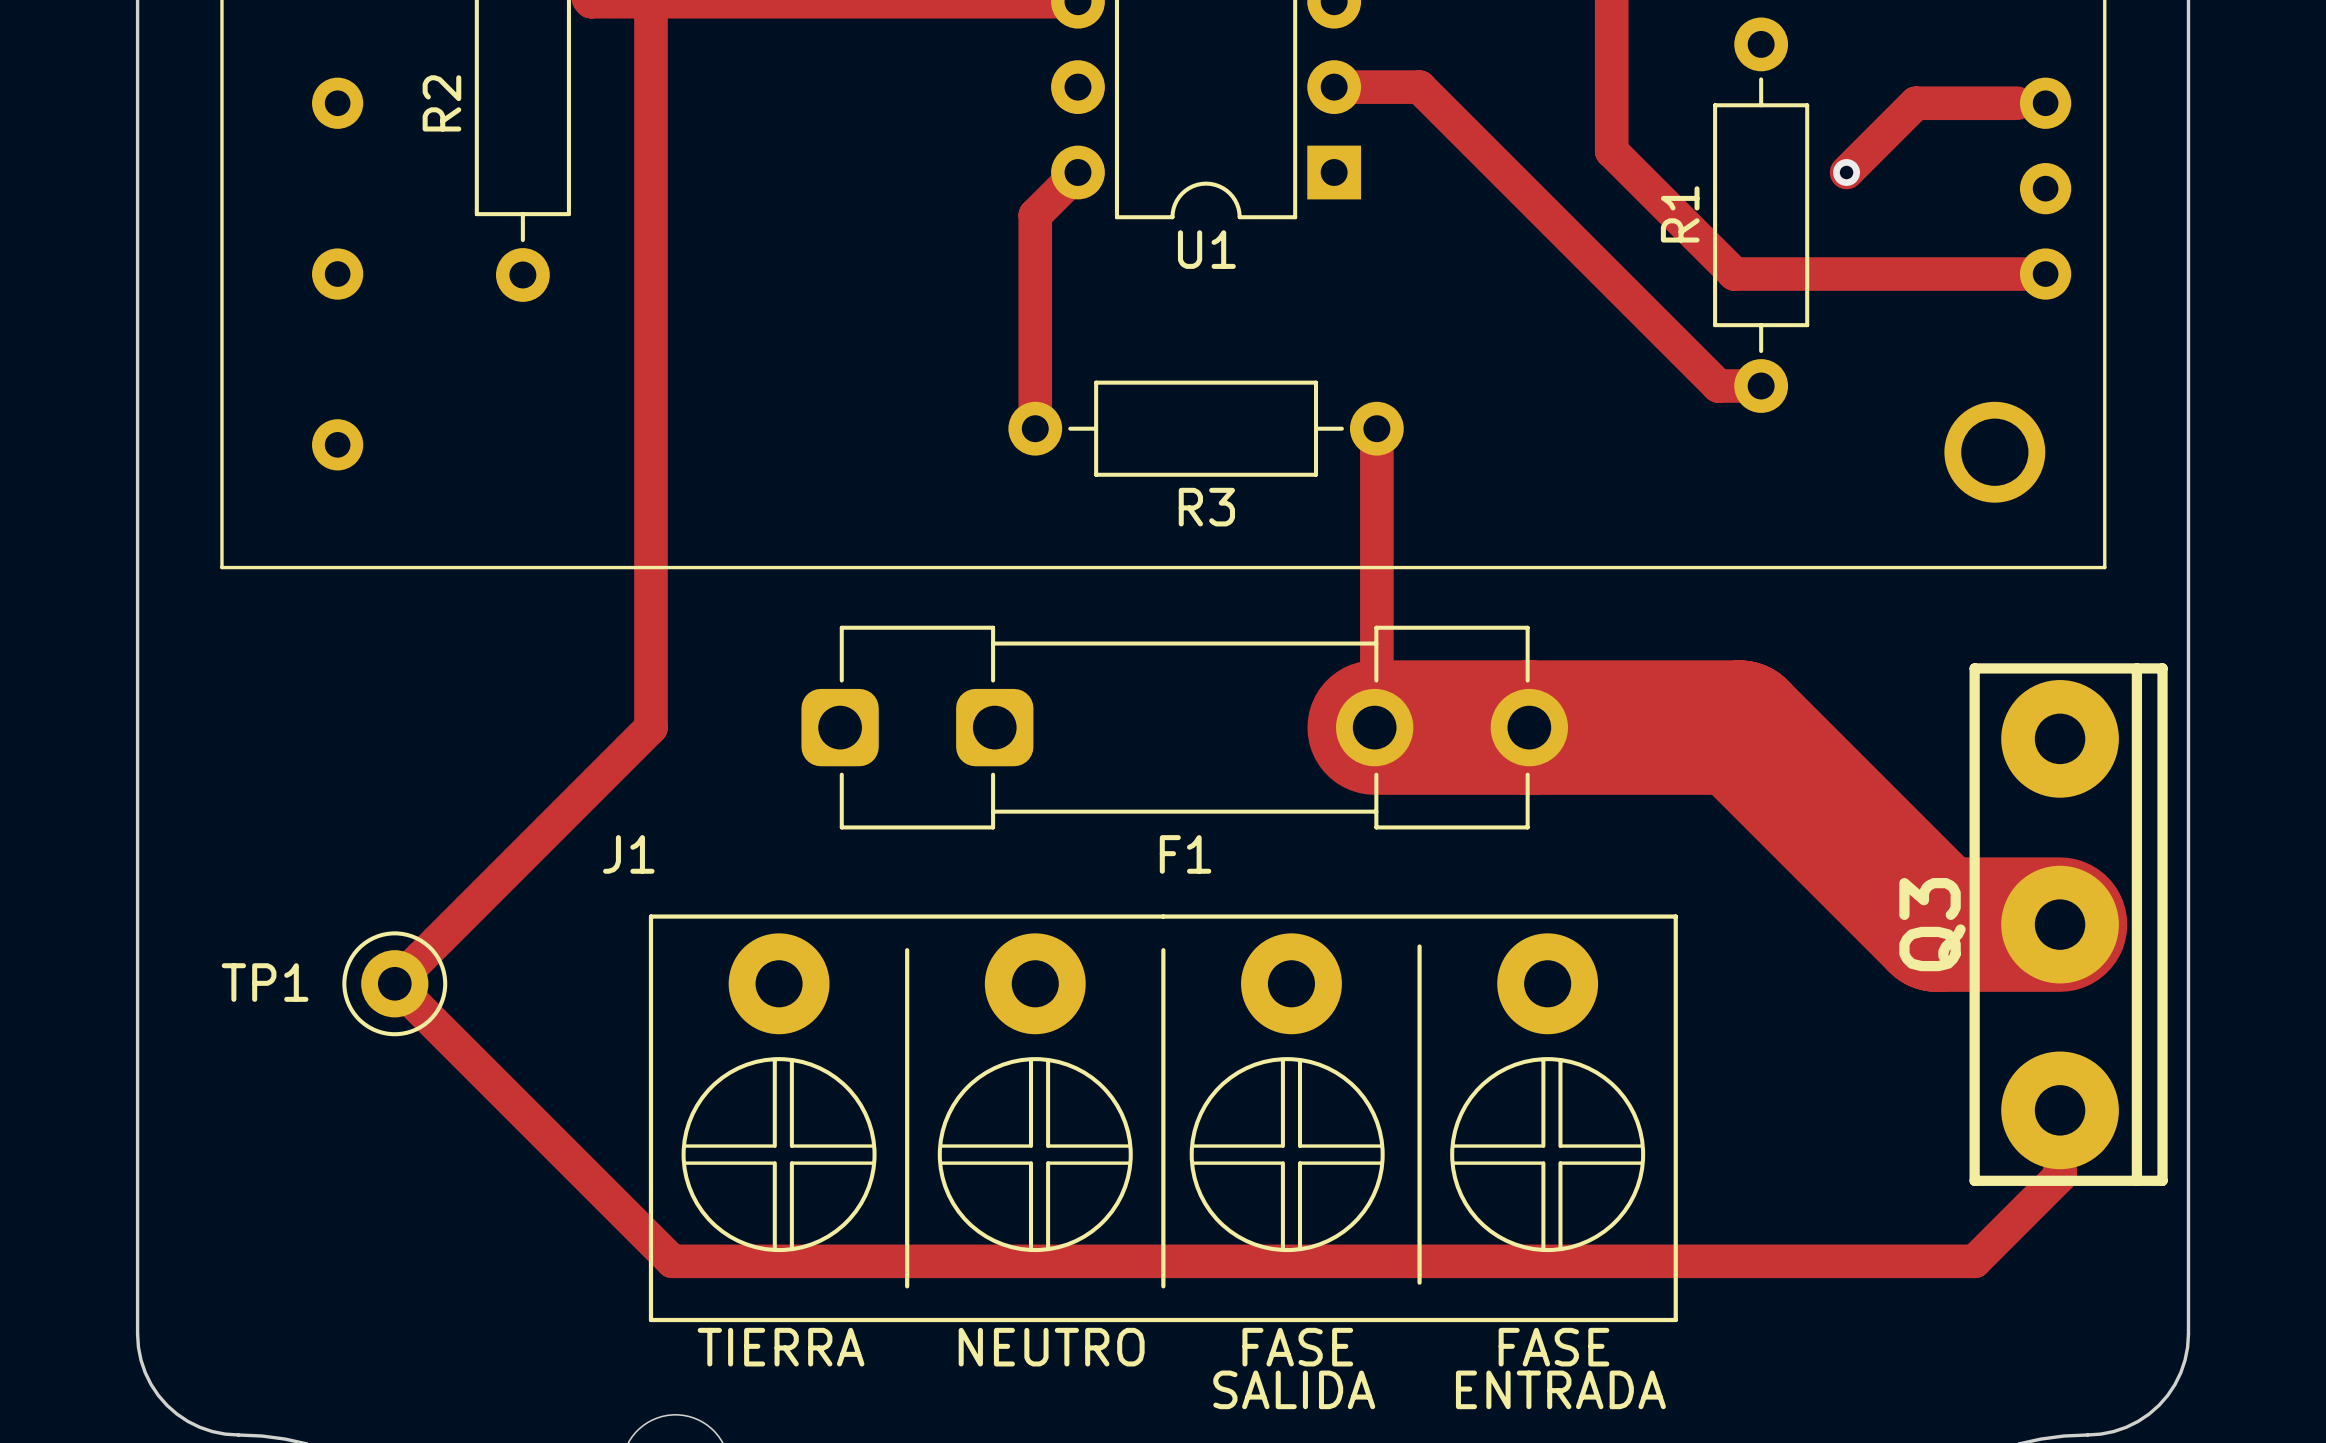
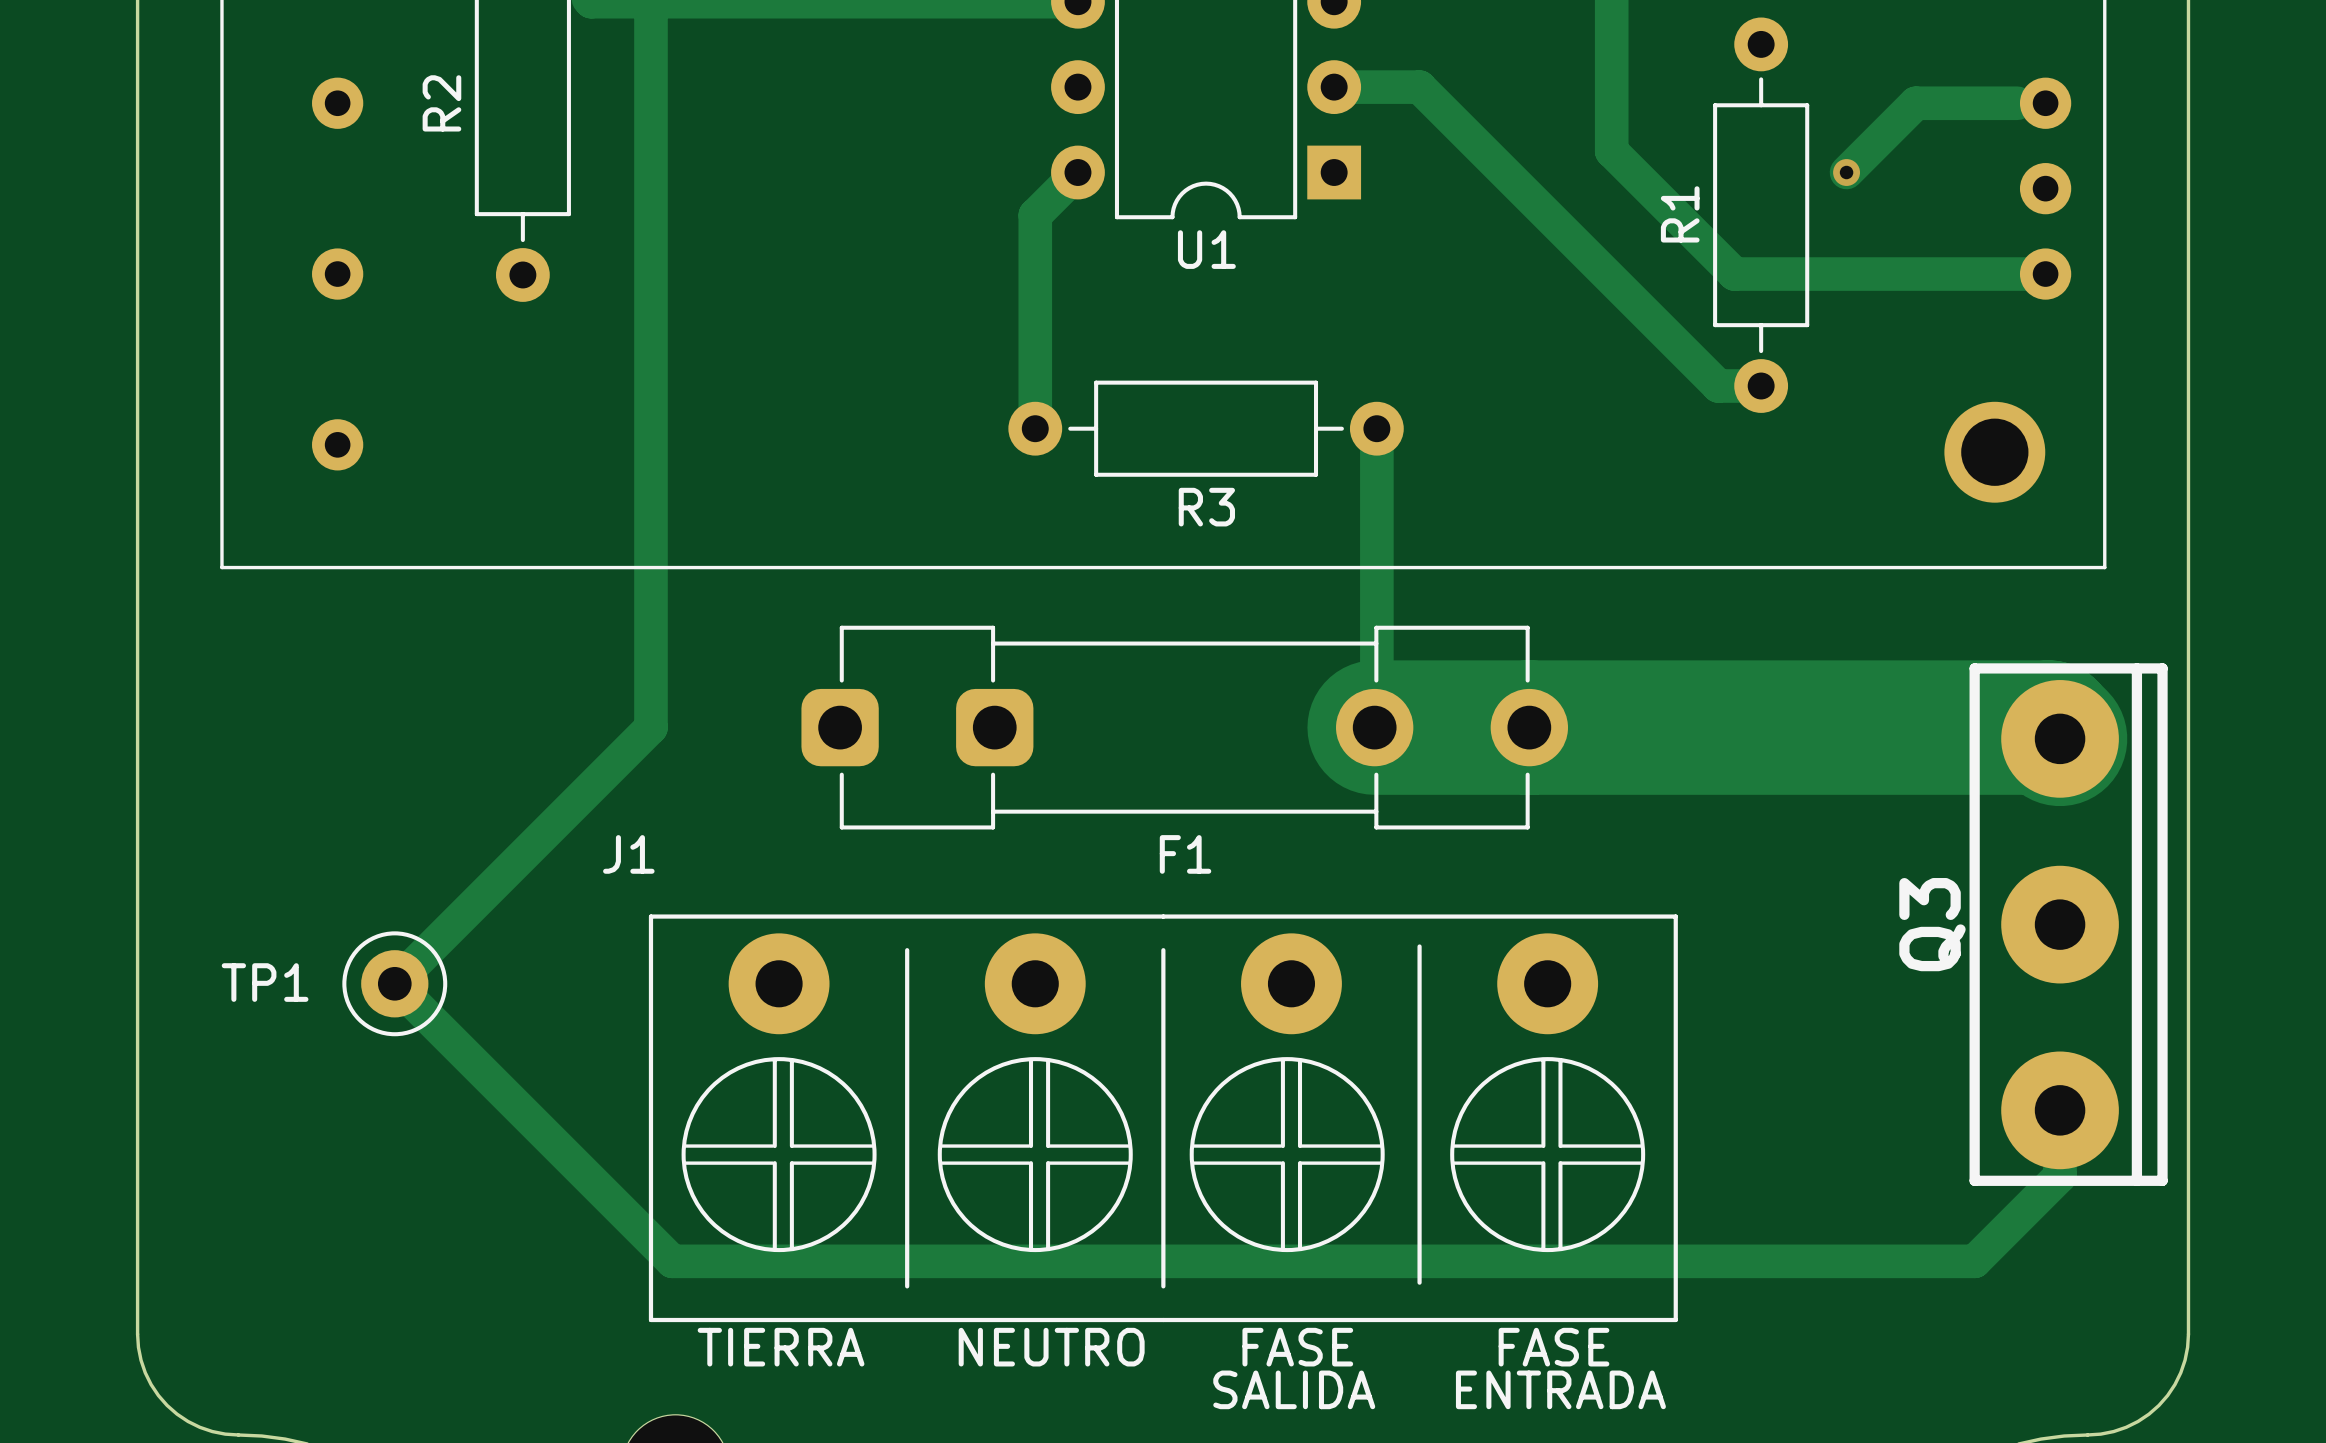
track: (1739, 727) (1936, 924) (2060, 924) -> (1739, 727) (2048, 727) (2060, 738)

